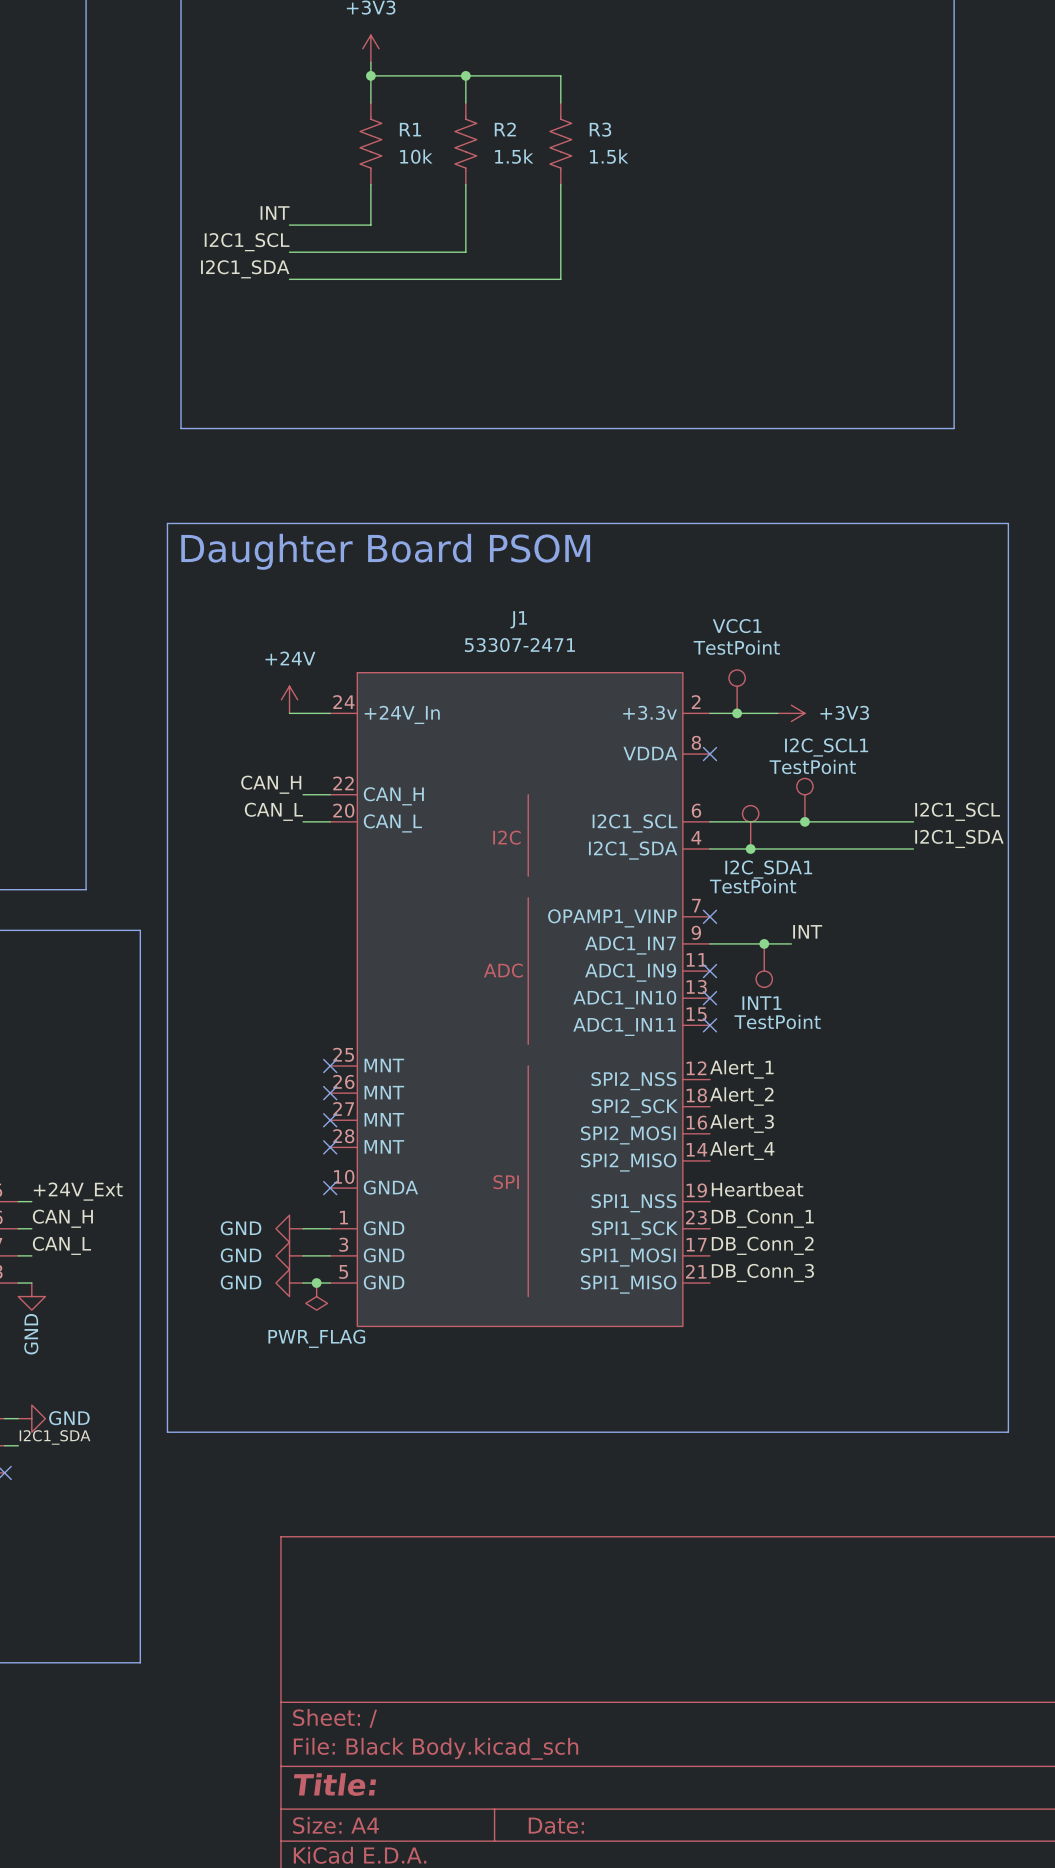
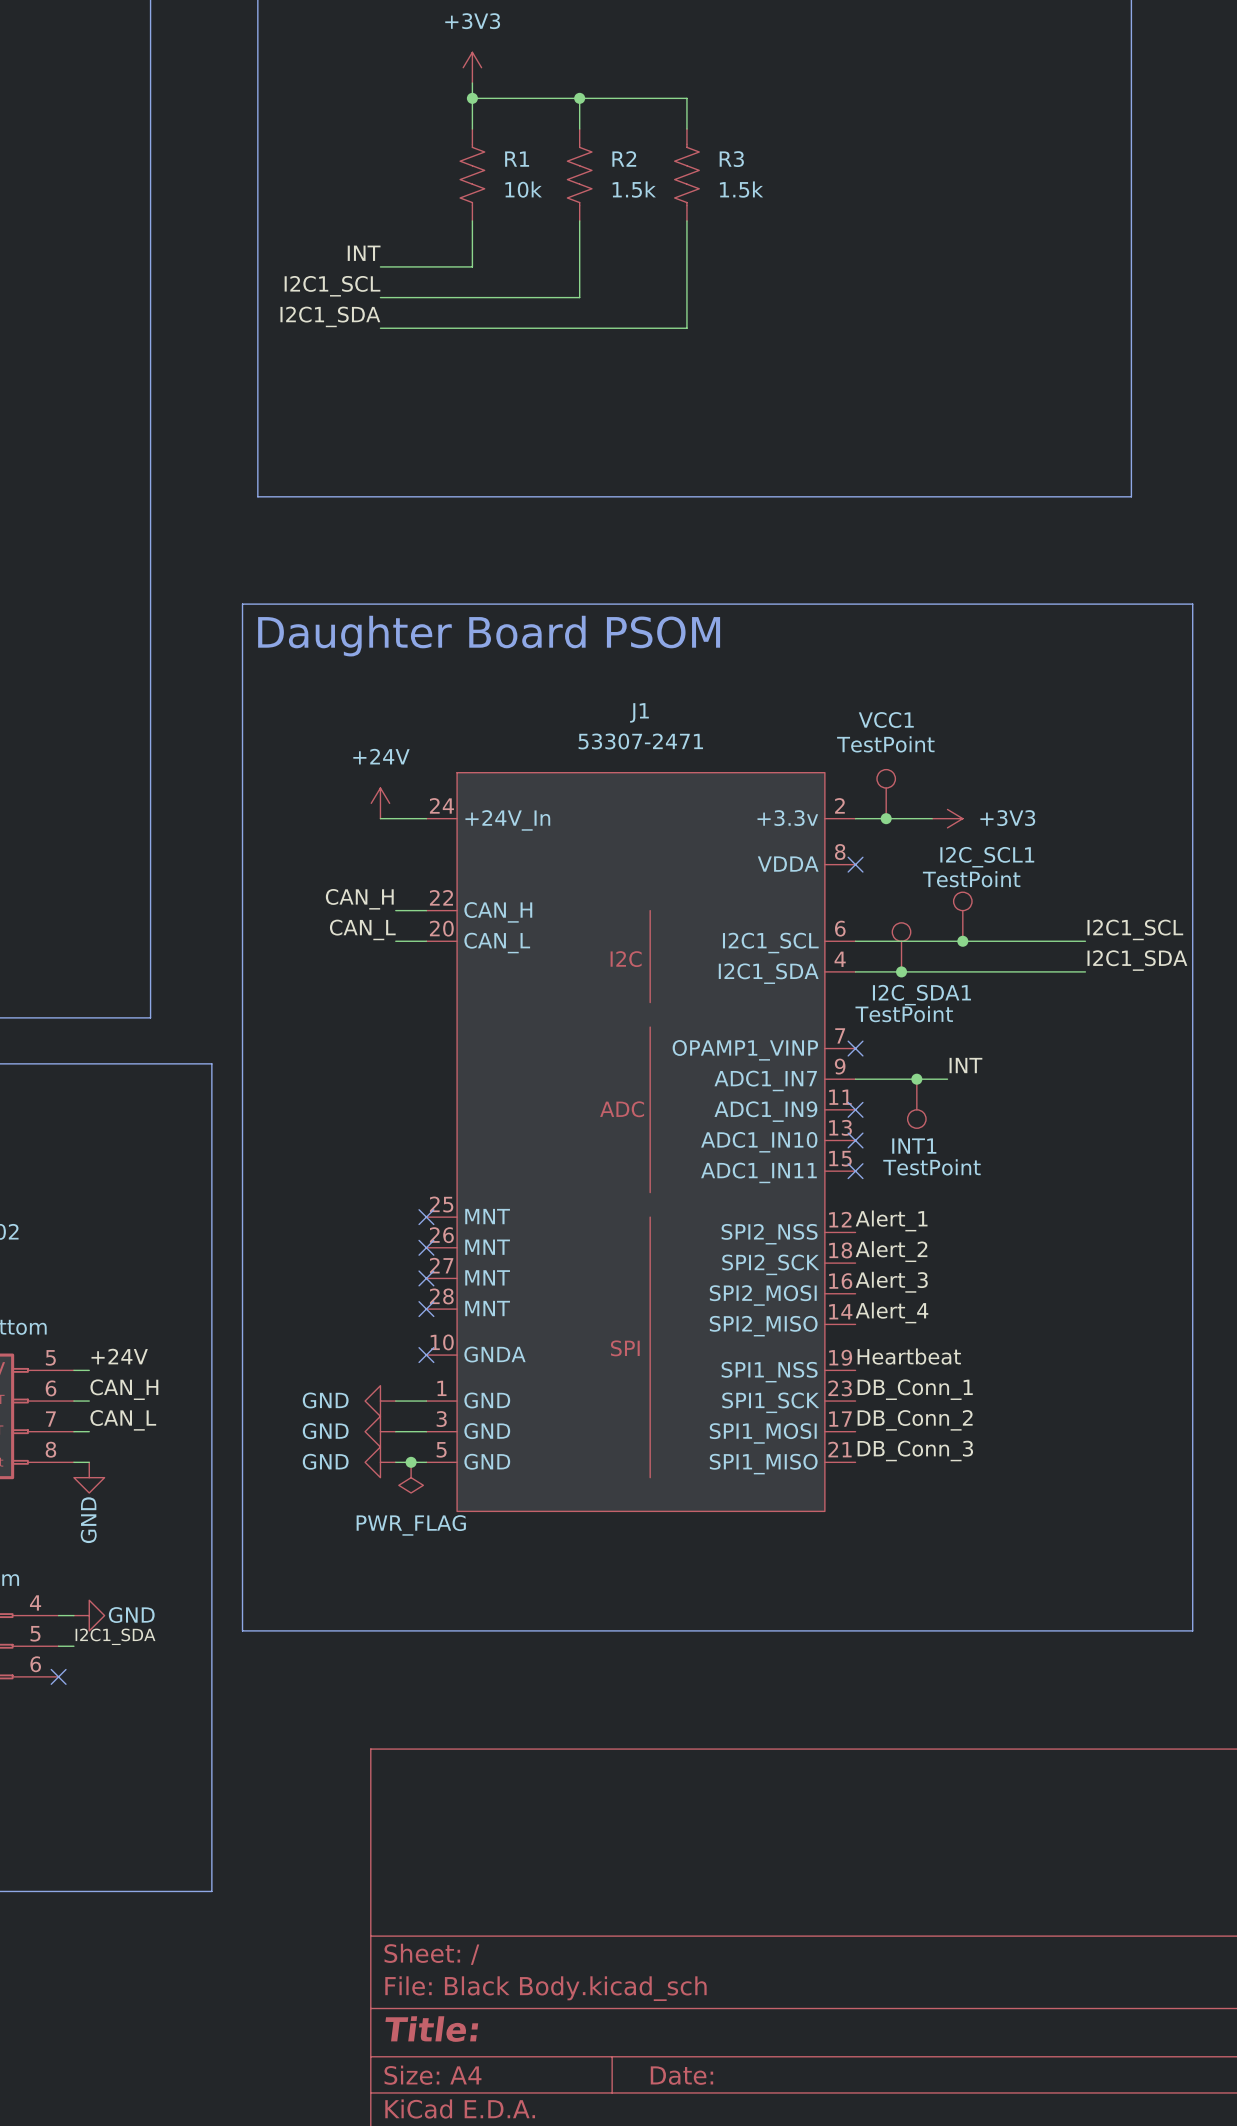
label: +24V_Ext (78, 1191) -> +24V (119, 1356)

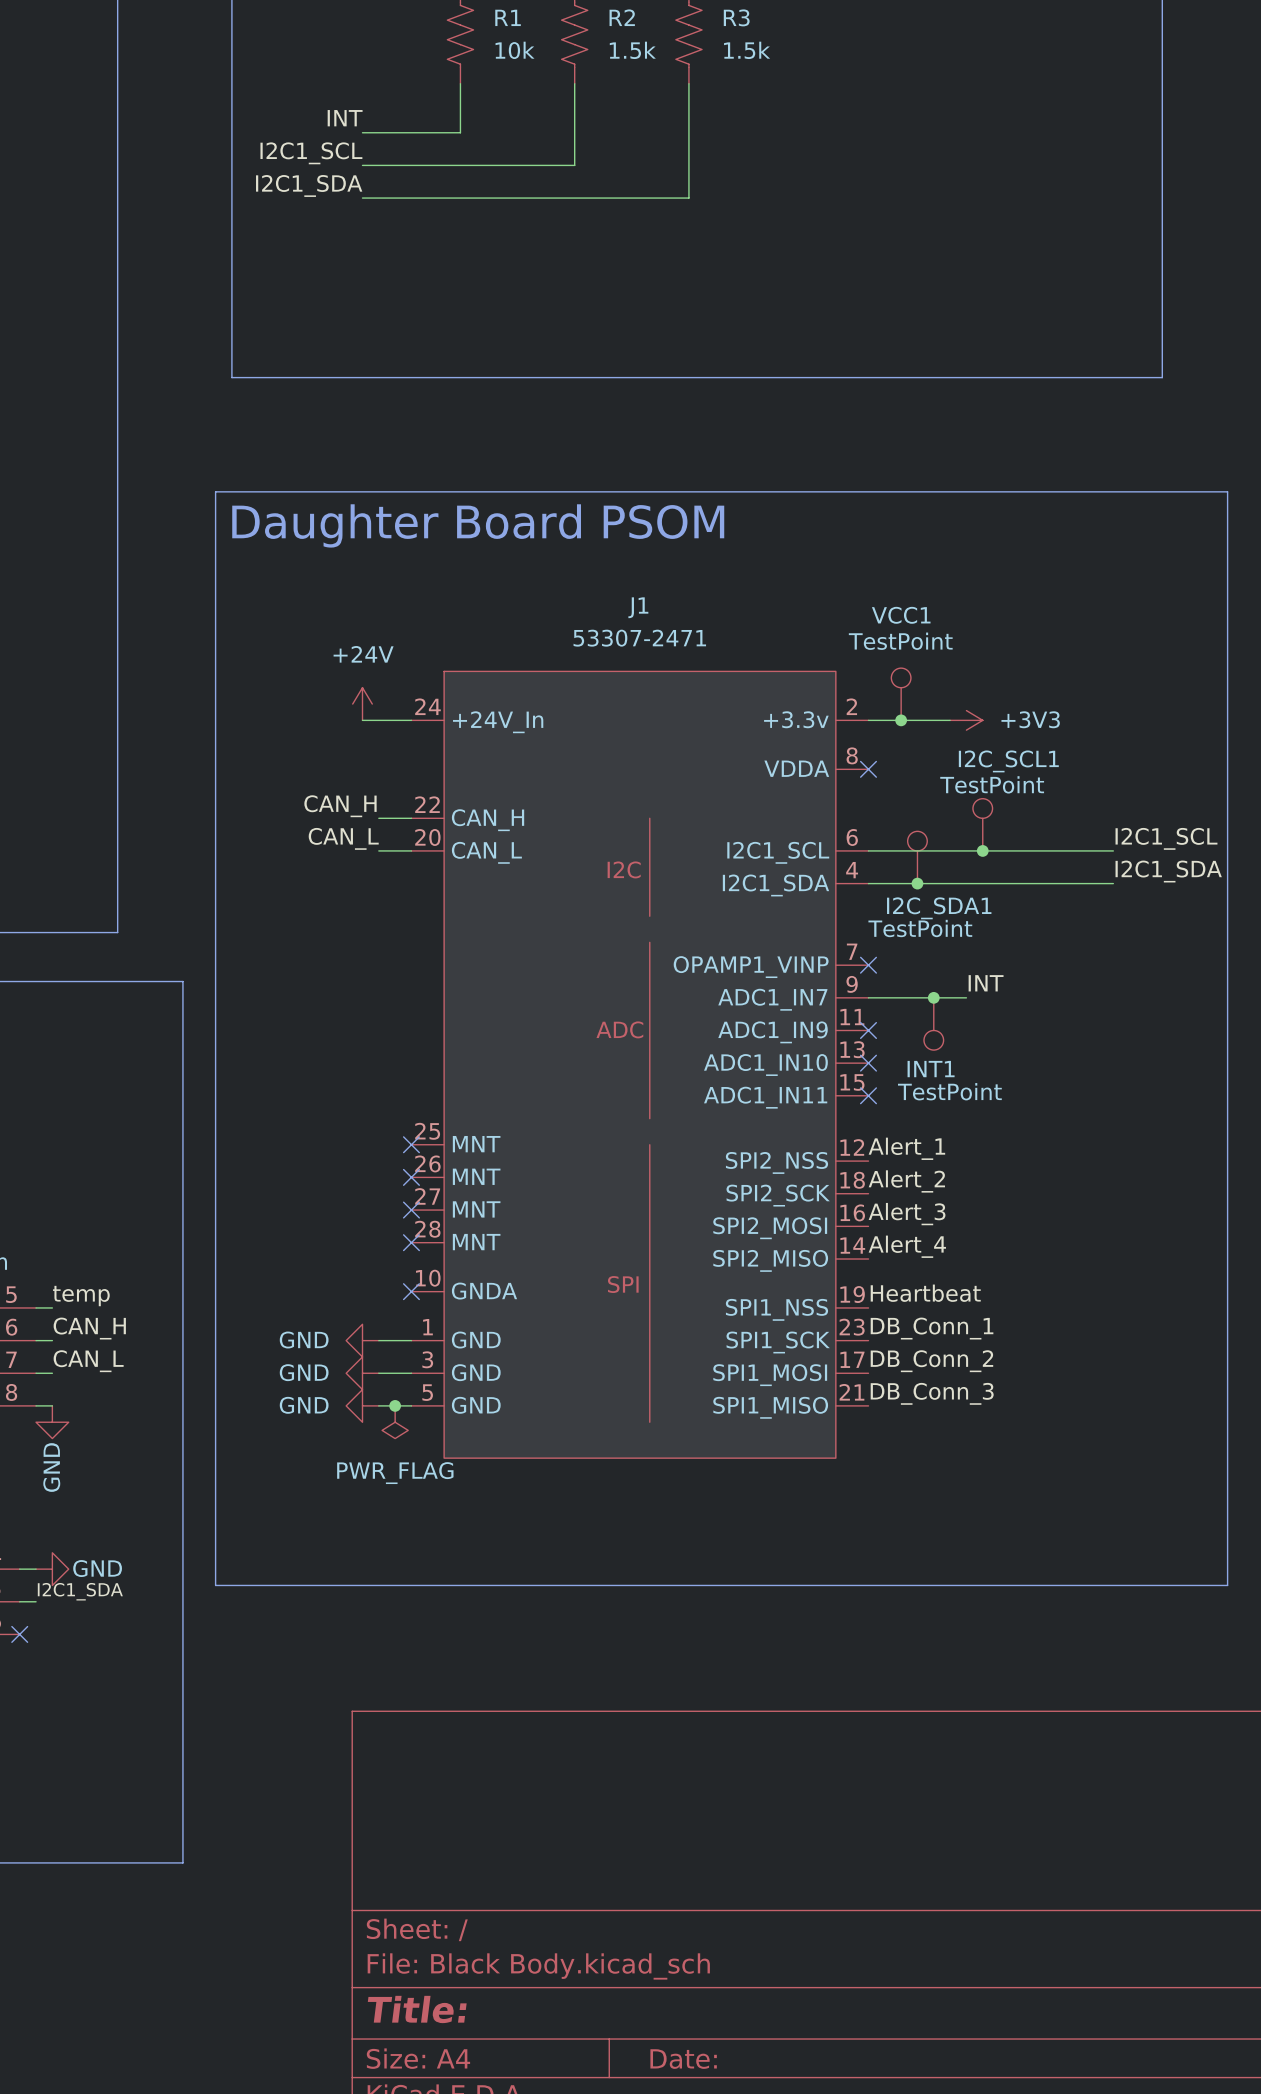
label: +24V (119, 1356) -> temp (81, 1296)

